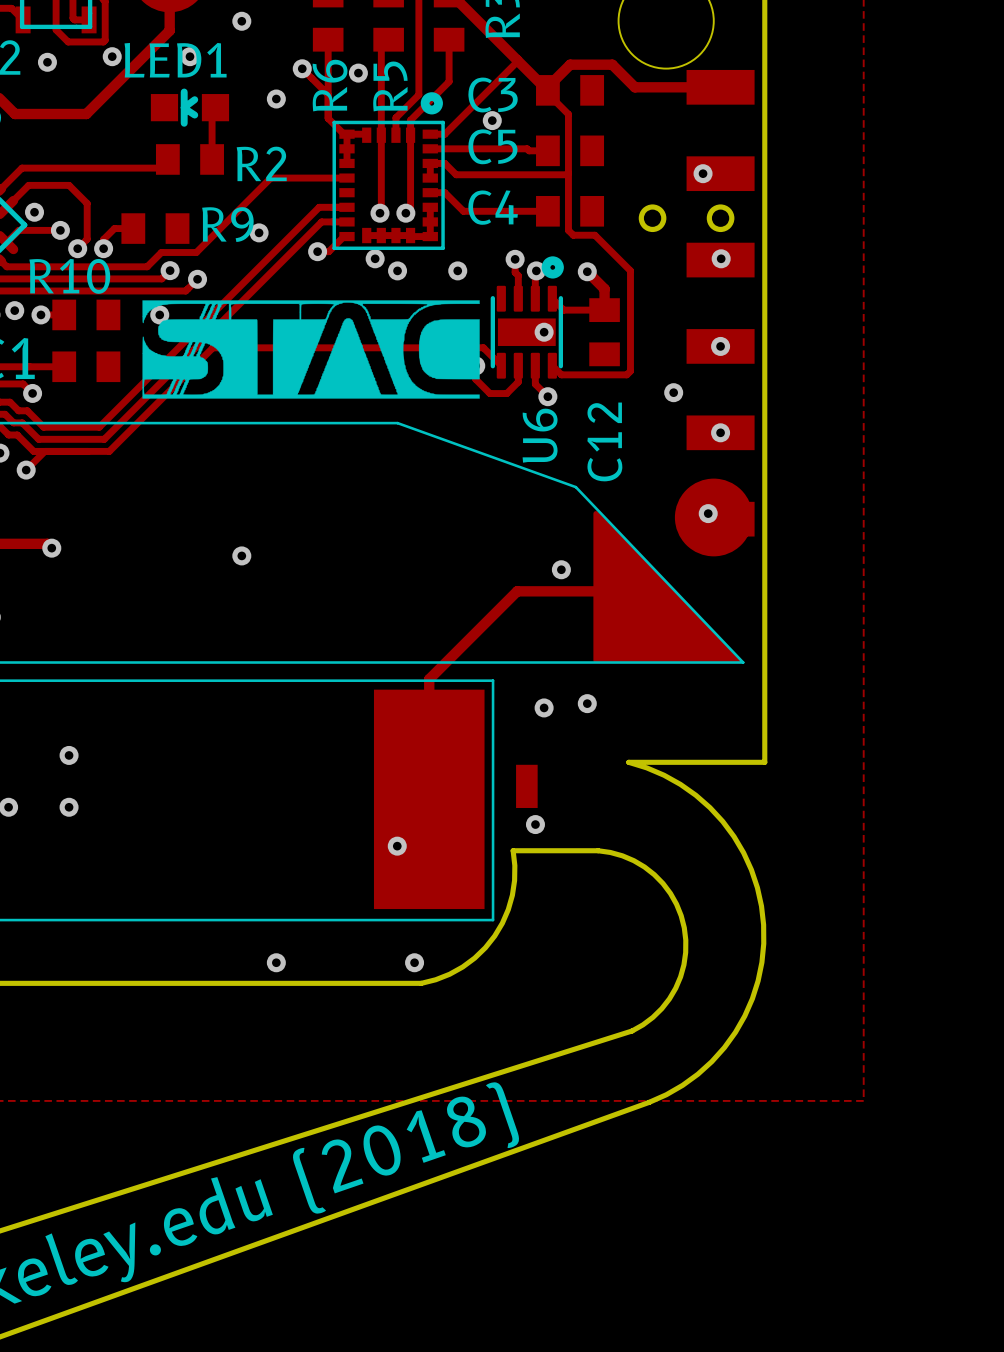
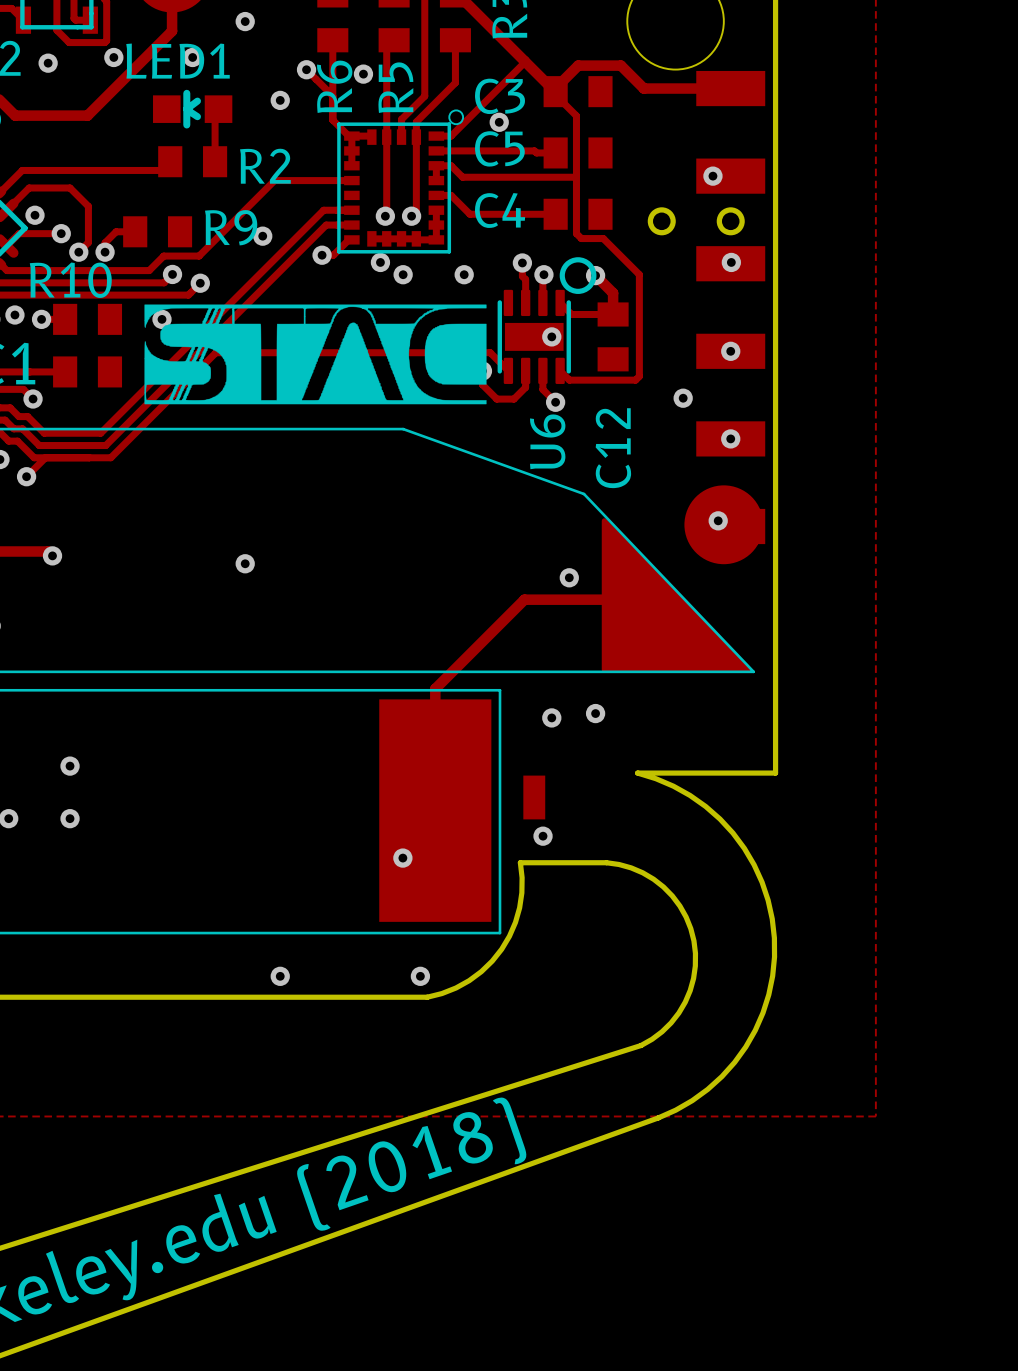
part footprint: [332, 92, 445, 251] -> [337, 110, 464, 254]
U6 footprint: [490, 256, 564, 379] -> [497, 257, 597, 384]

